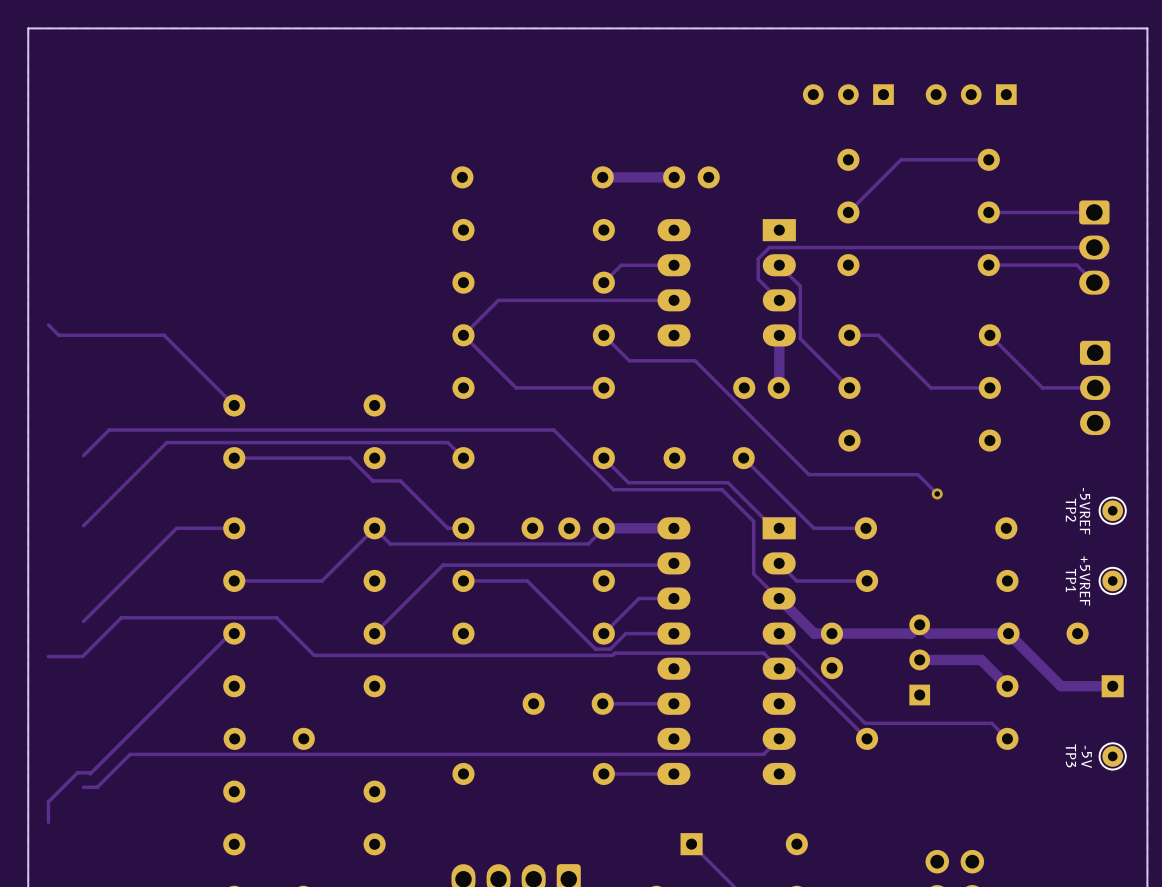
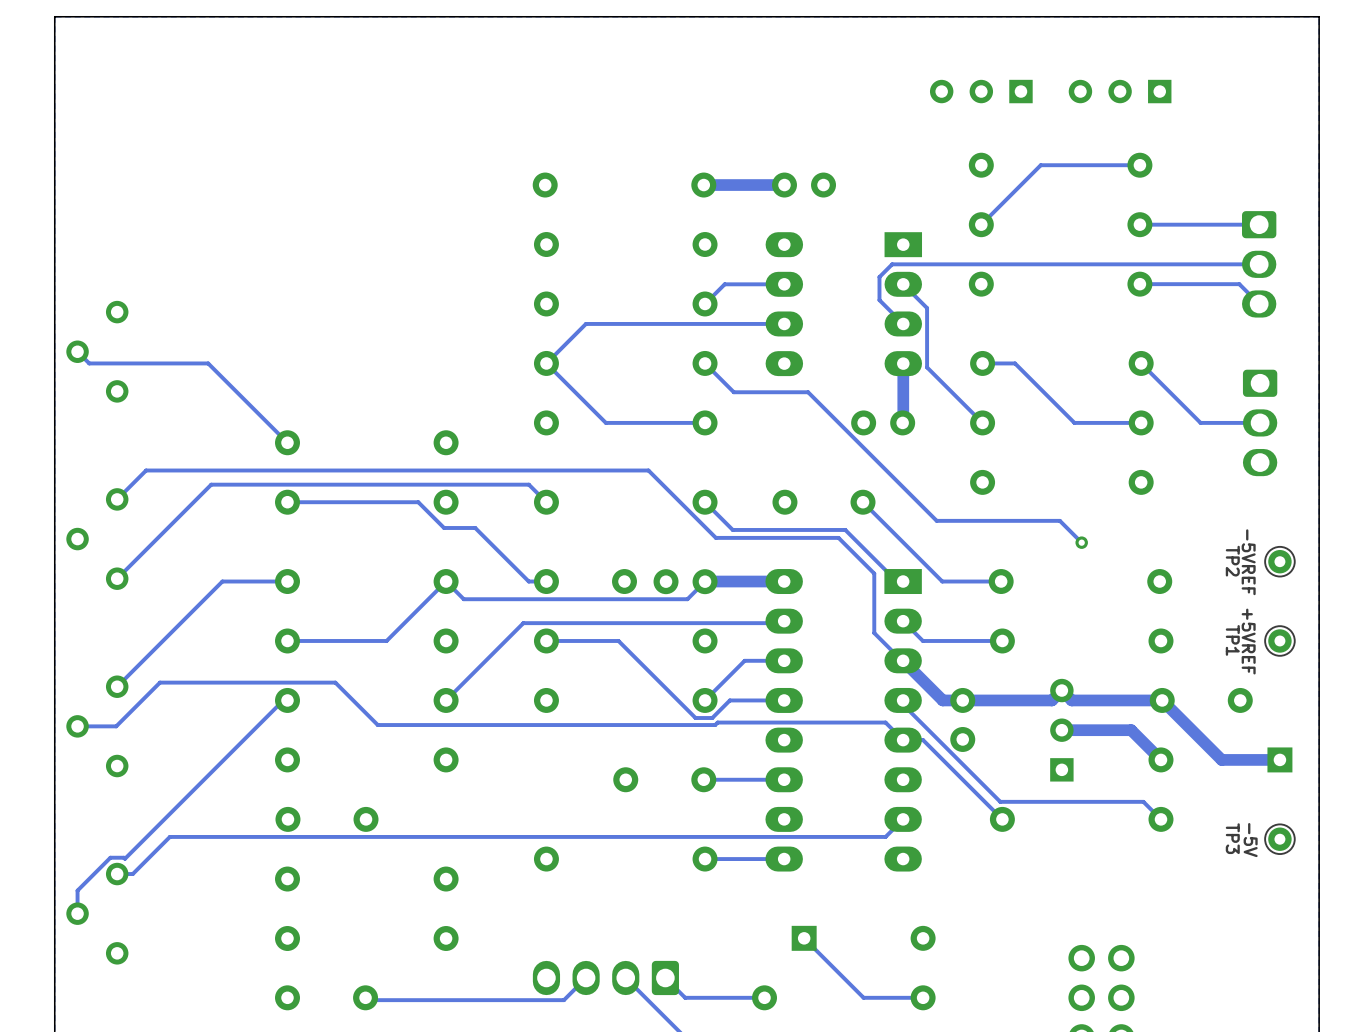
part: none -> (97, 351)
part: none -> (97, 539)
part: none -> (97, 726)
part: none -> (97, 913)

